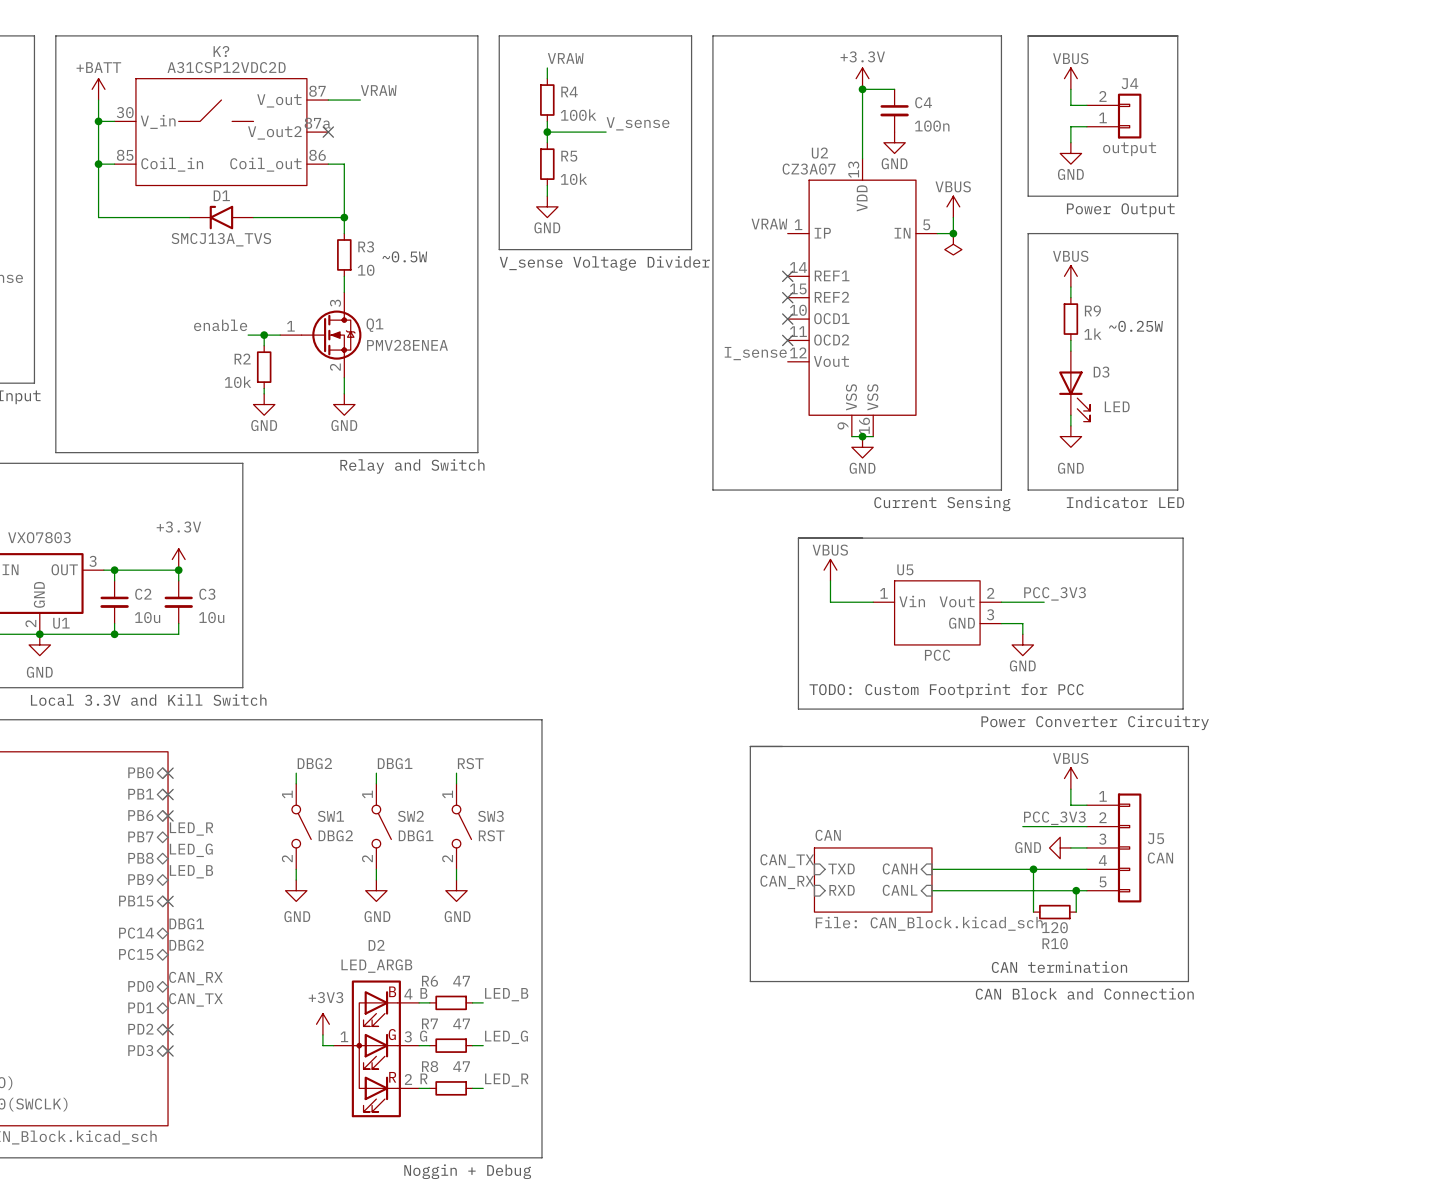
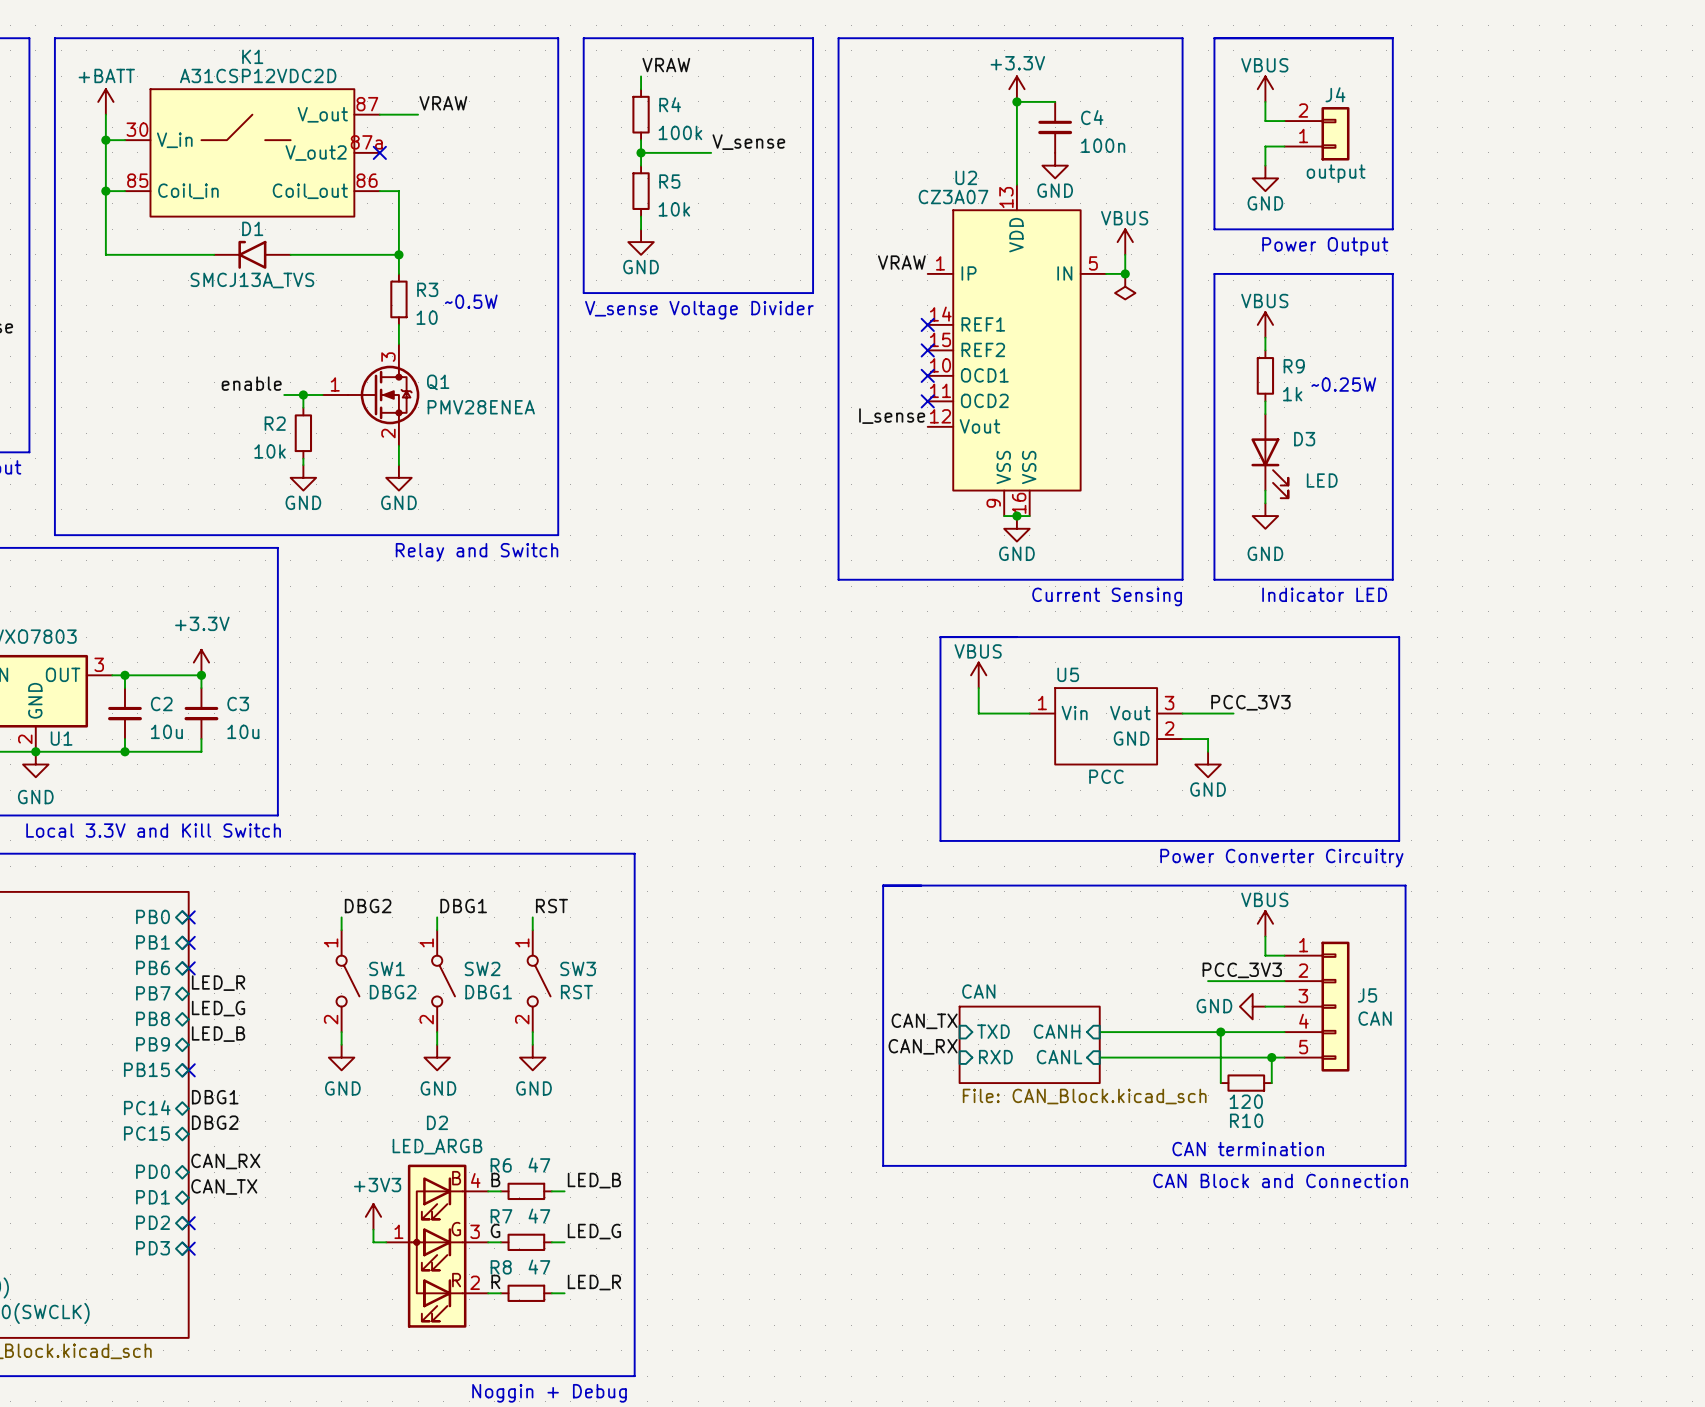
K? name: K? (221, 51) -> K1 (252, 56)
U5 pin number: 2 (990, 593) -> 3 (1169, 703)
U5 pin number: 3 (990, 614) -> 2 (1169, 728)
text: TODO: Custom Footprint for PCC (946, 690) -> none

